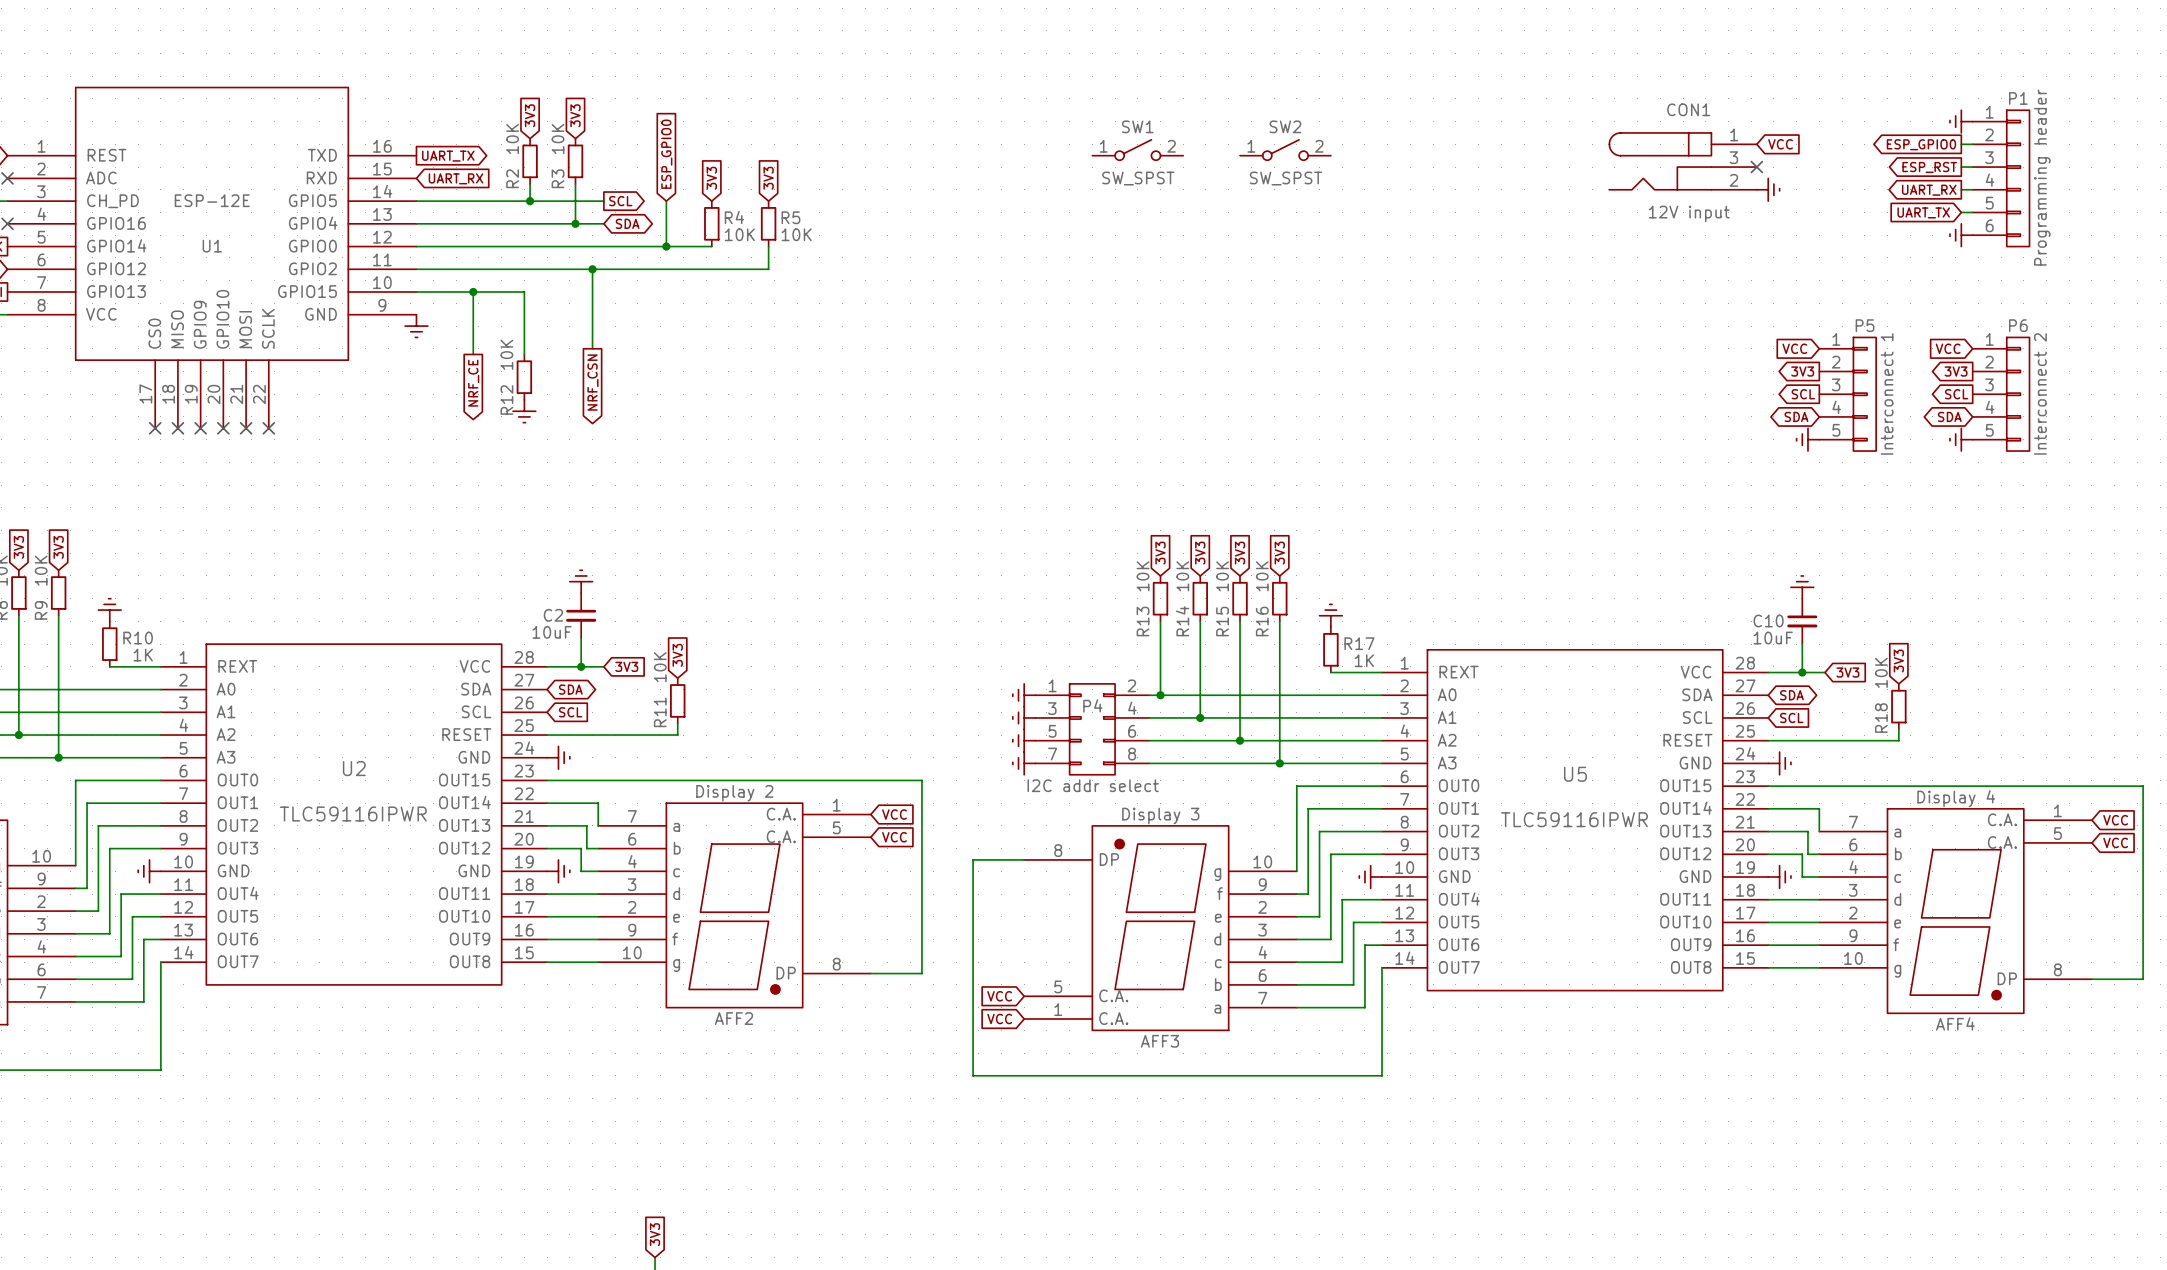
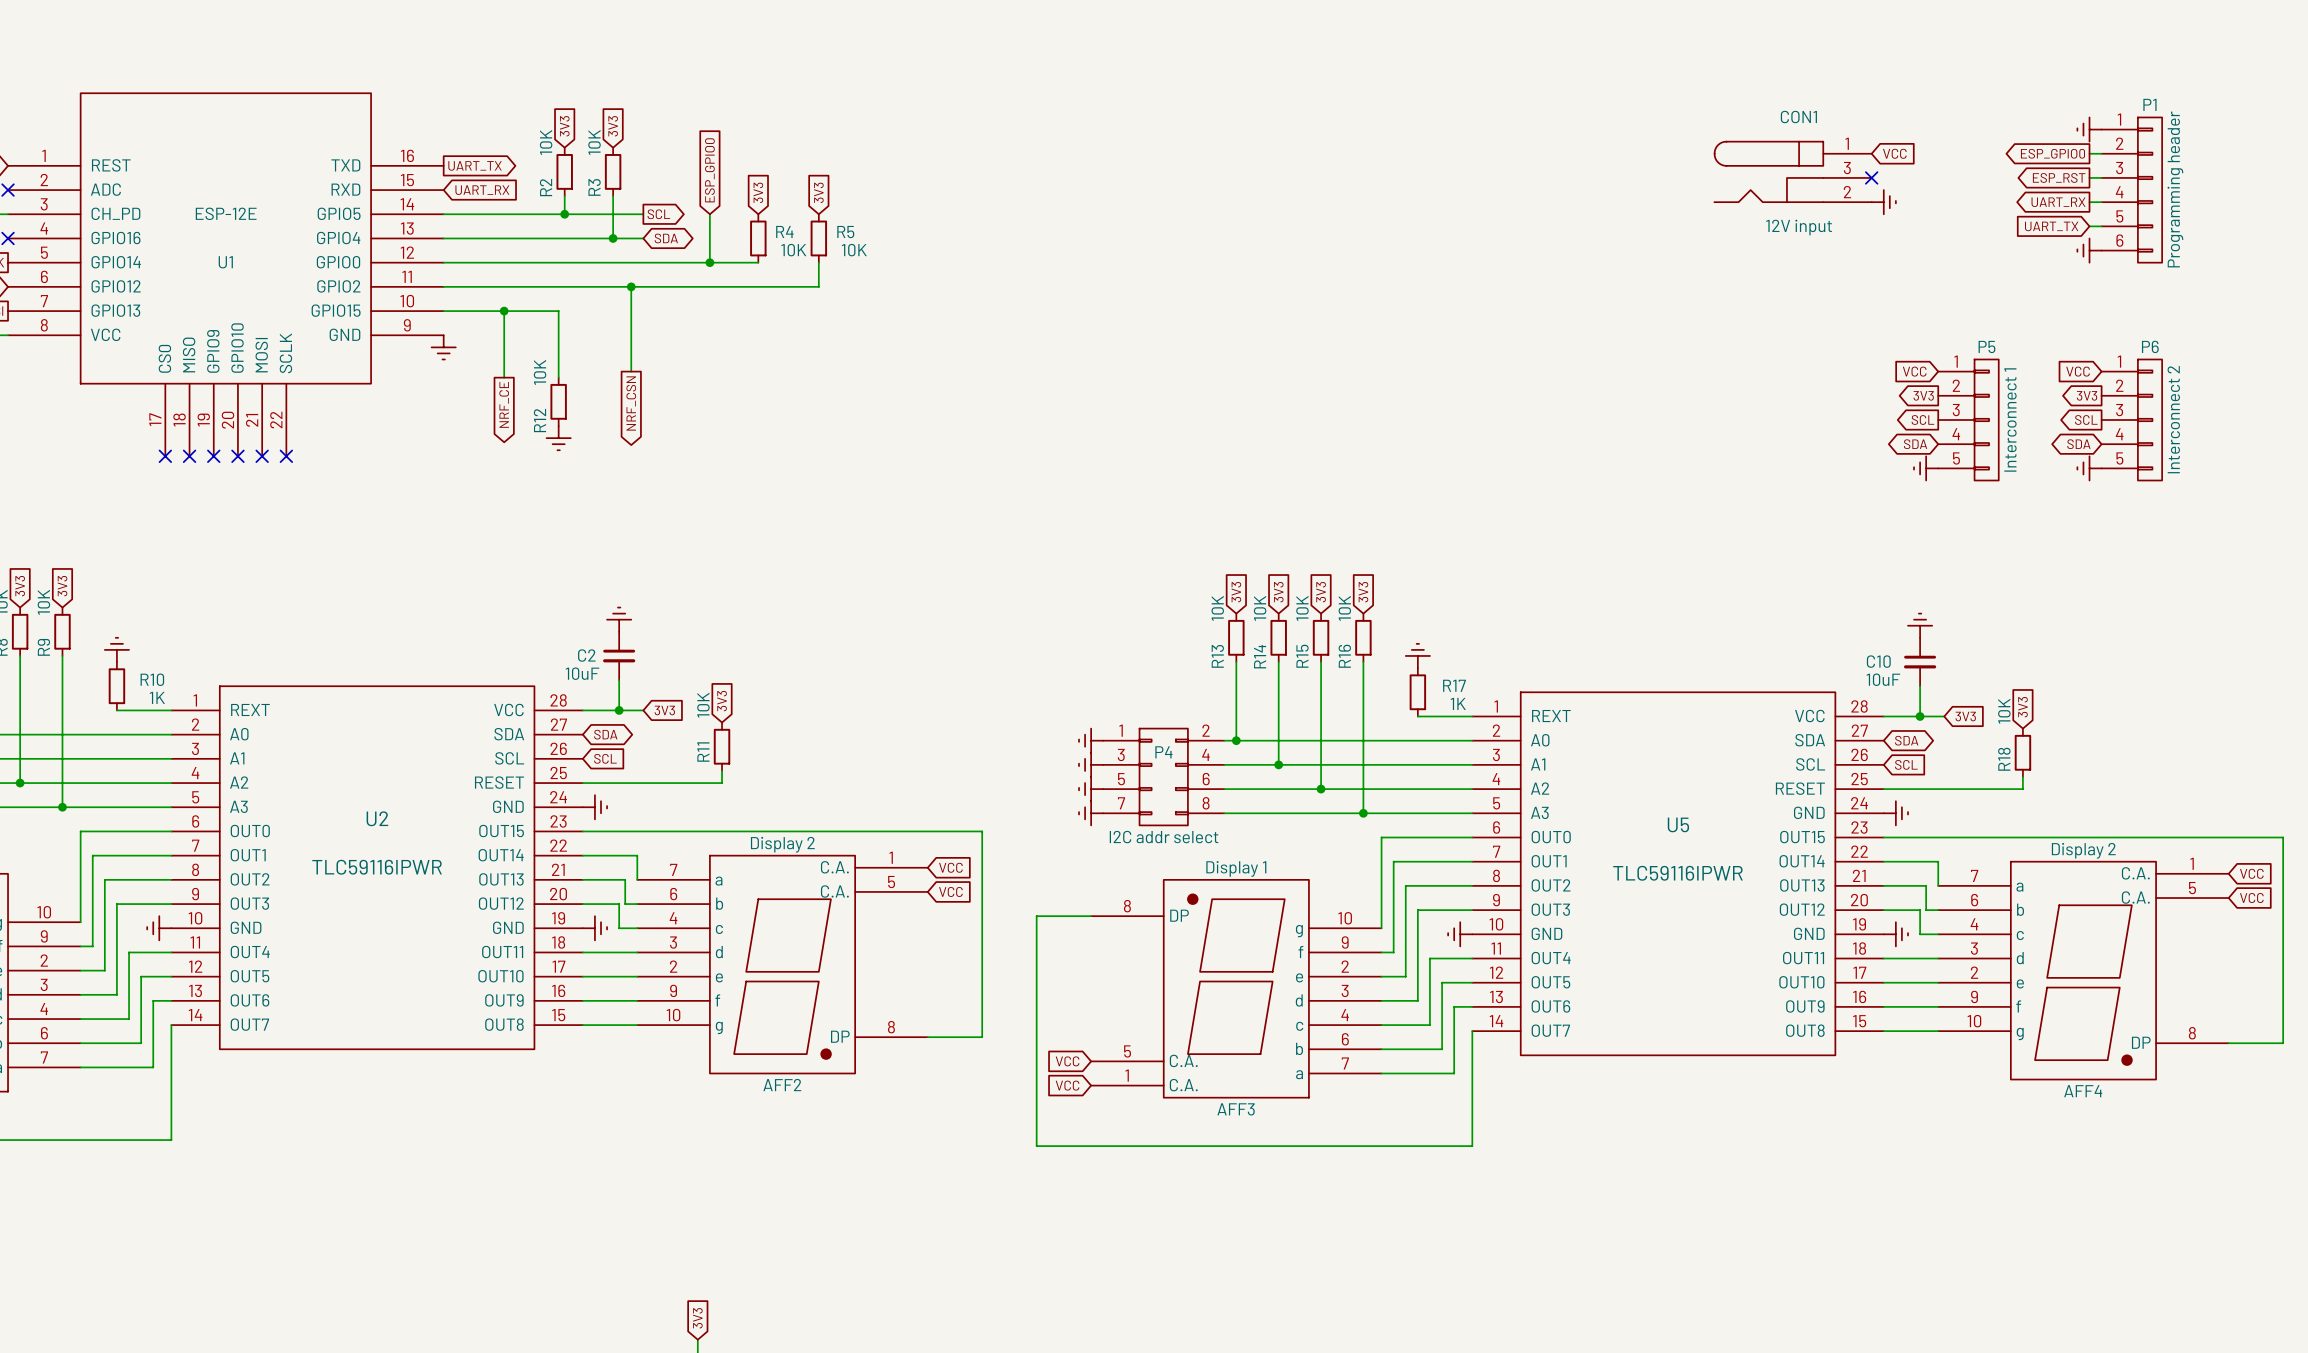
SW1: SW_SPST (1137, 150) -> none
SW2: SW_SPST (1285, 150) -> none
AFF4 value: Display 4 (1956, 798) -> Display 2 (2083, 850)
AFF3 value: Display 3 (1160, 815) -> Display 1 (1236, 868)

